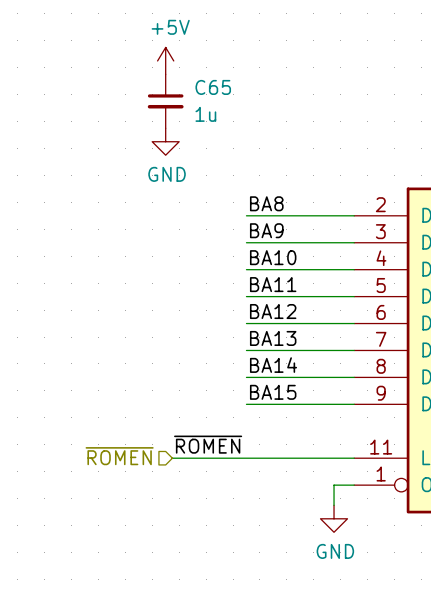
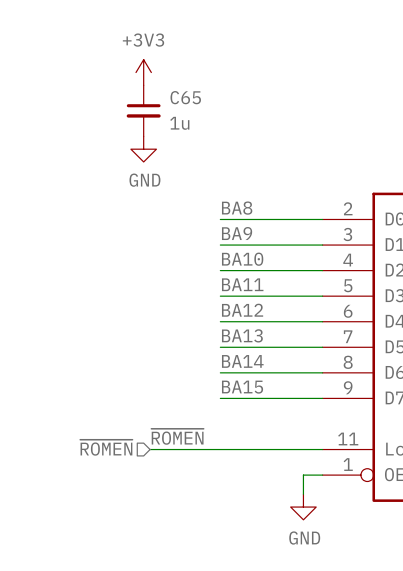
power symbol: +5V (165, 60) -> +3V3 (143, 72)

